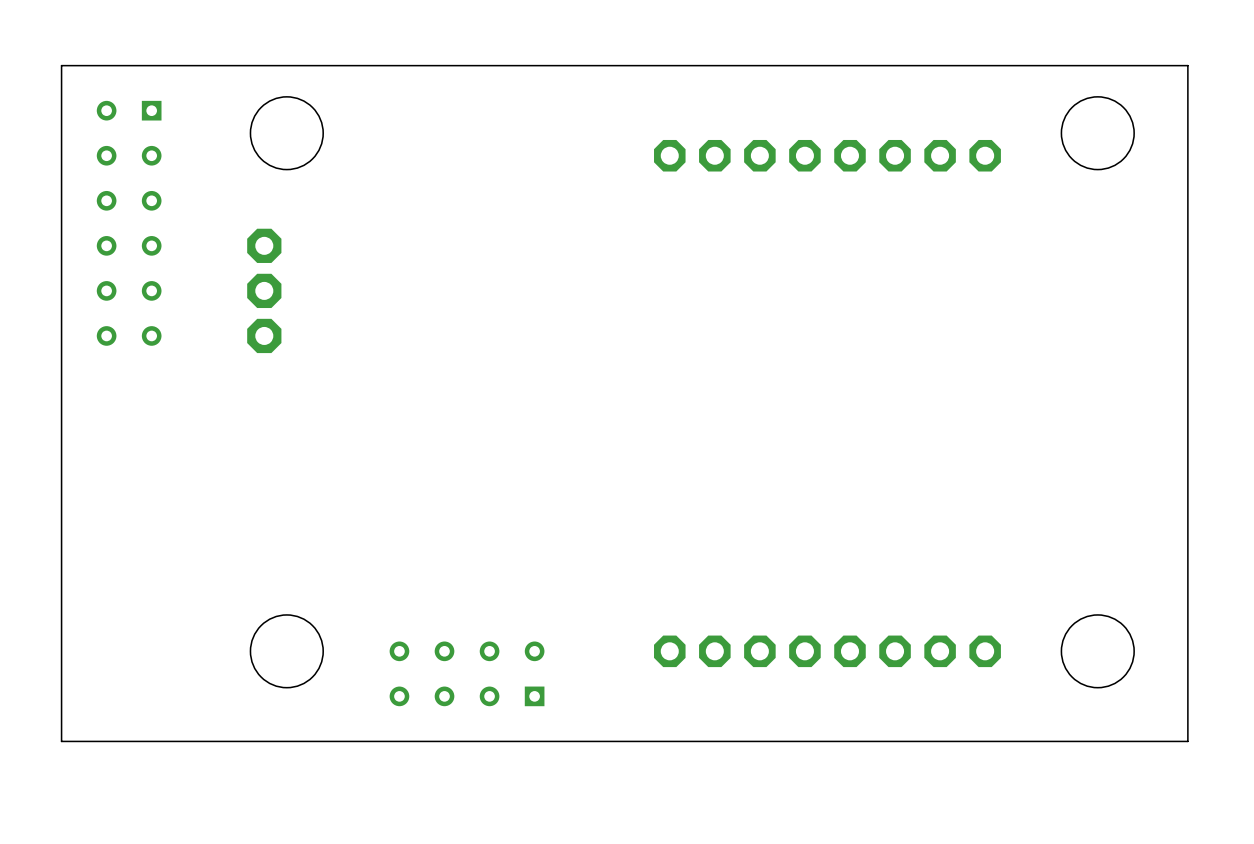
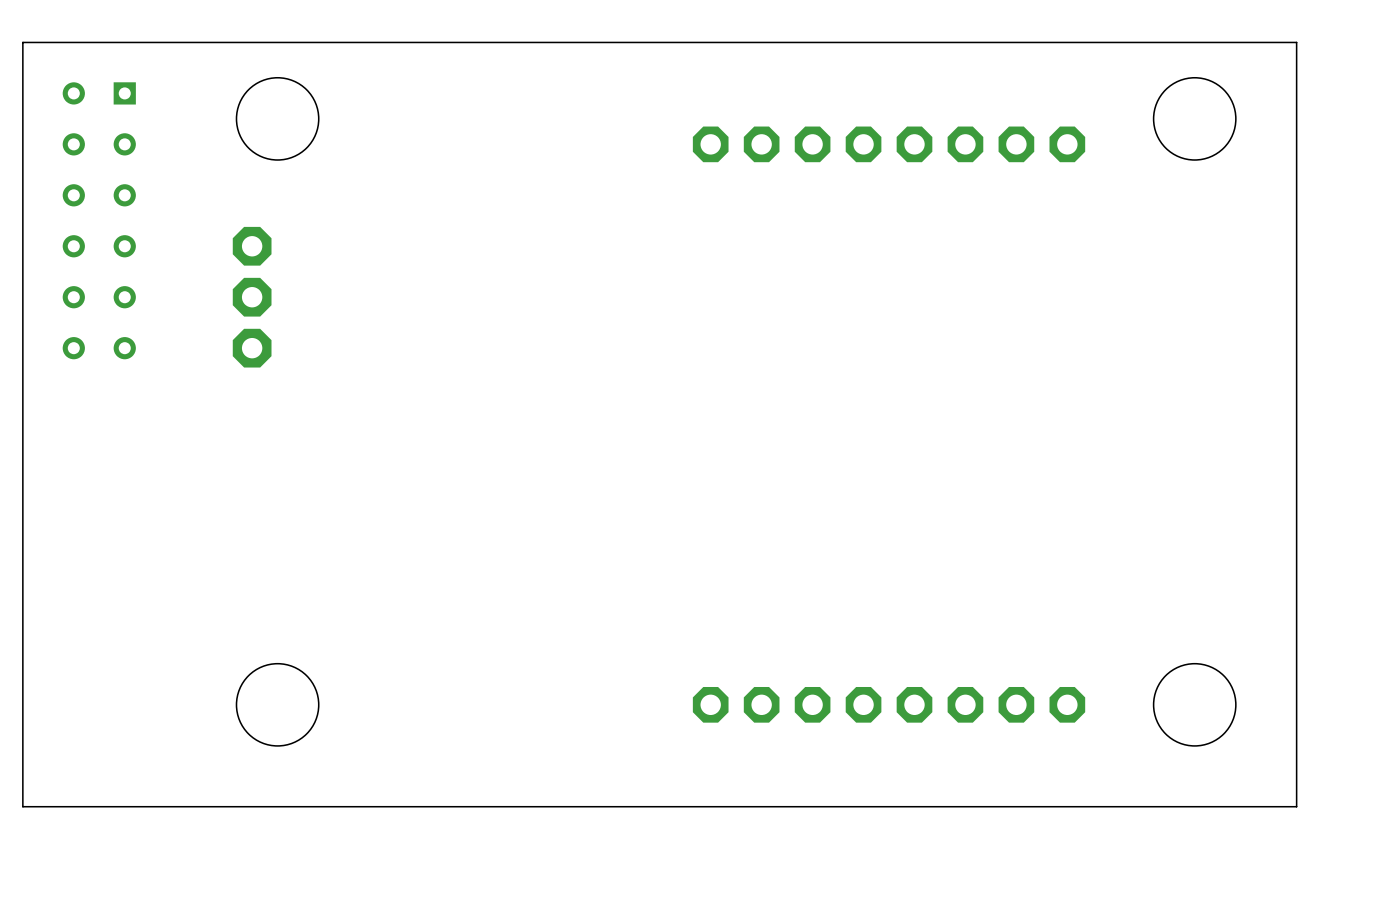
part: (467, 673) -> none

